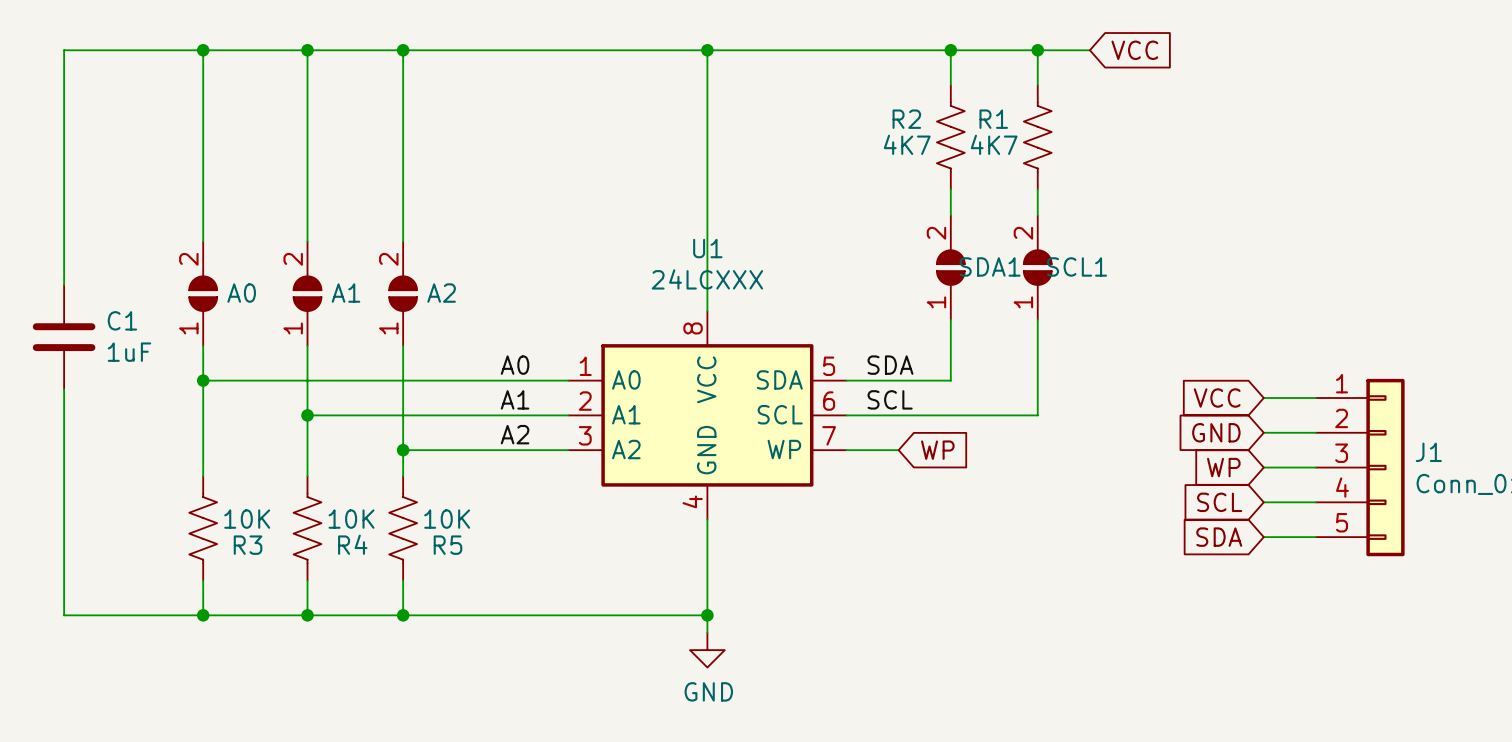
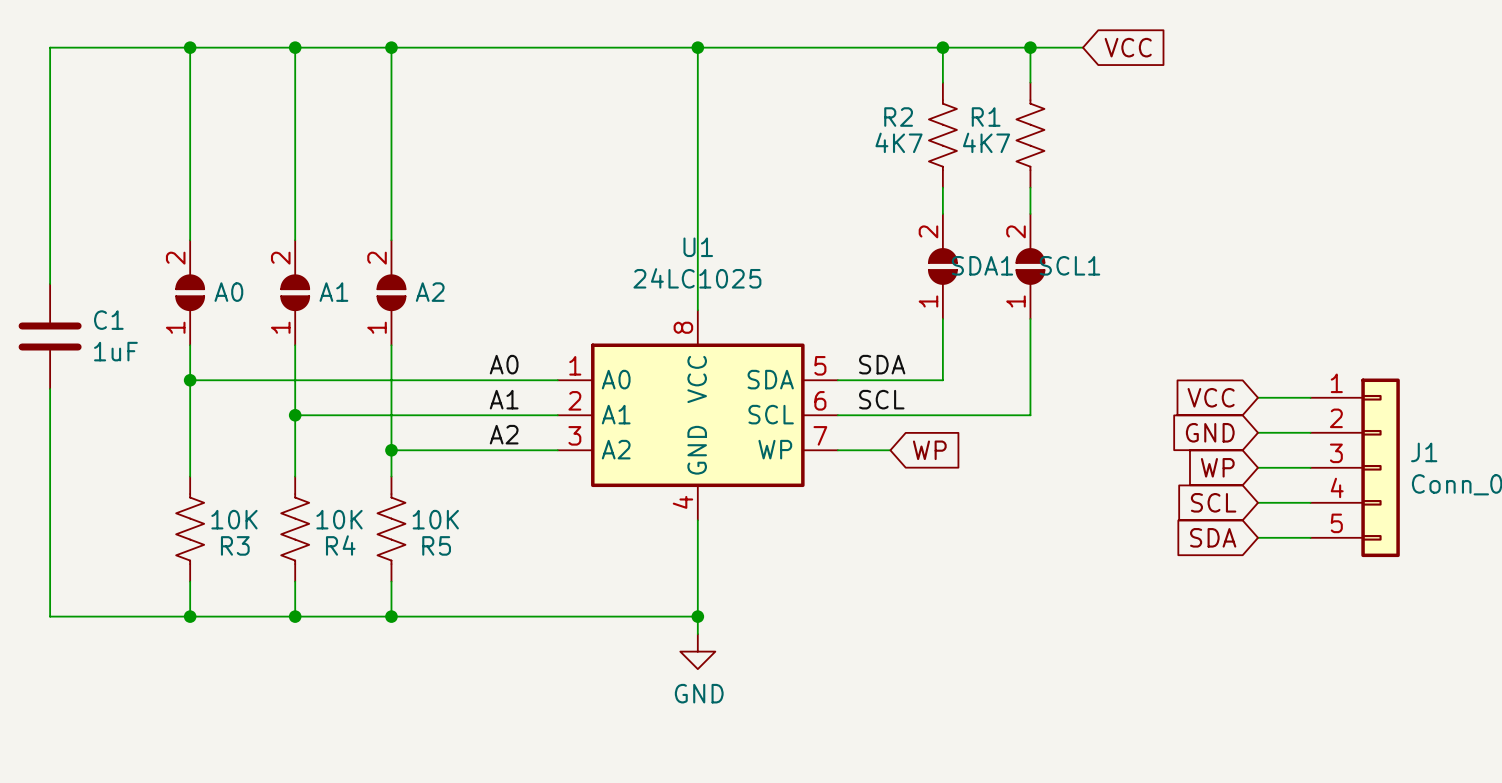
U1 value: 24LCXXX (707, 279) -> 24LC1025 (697, 278)

